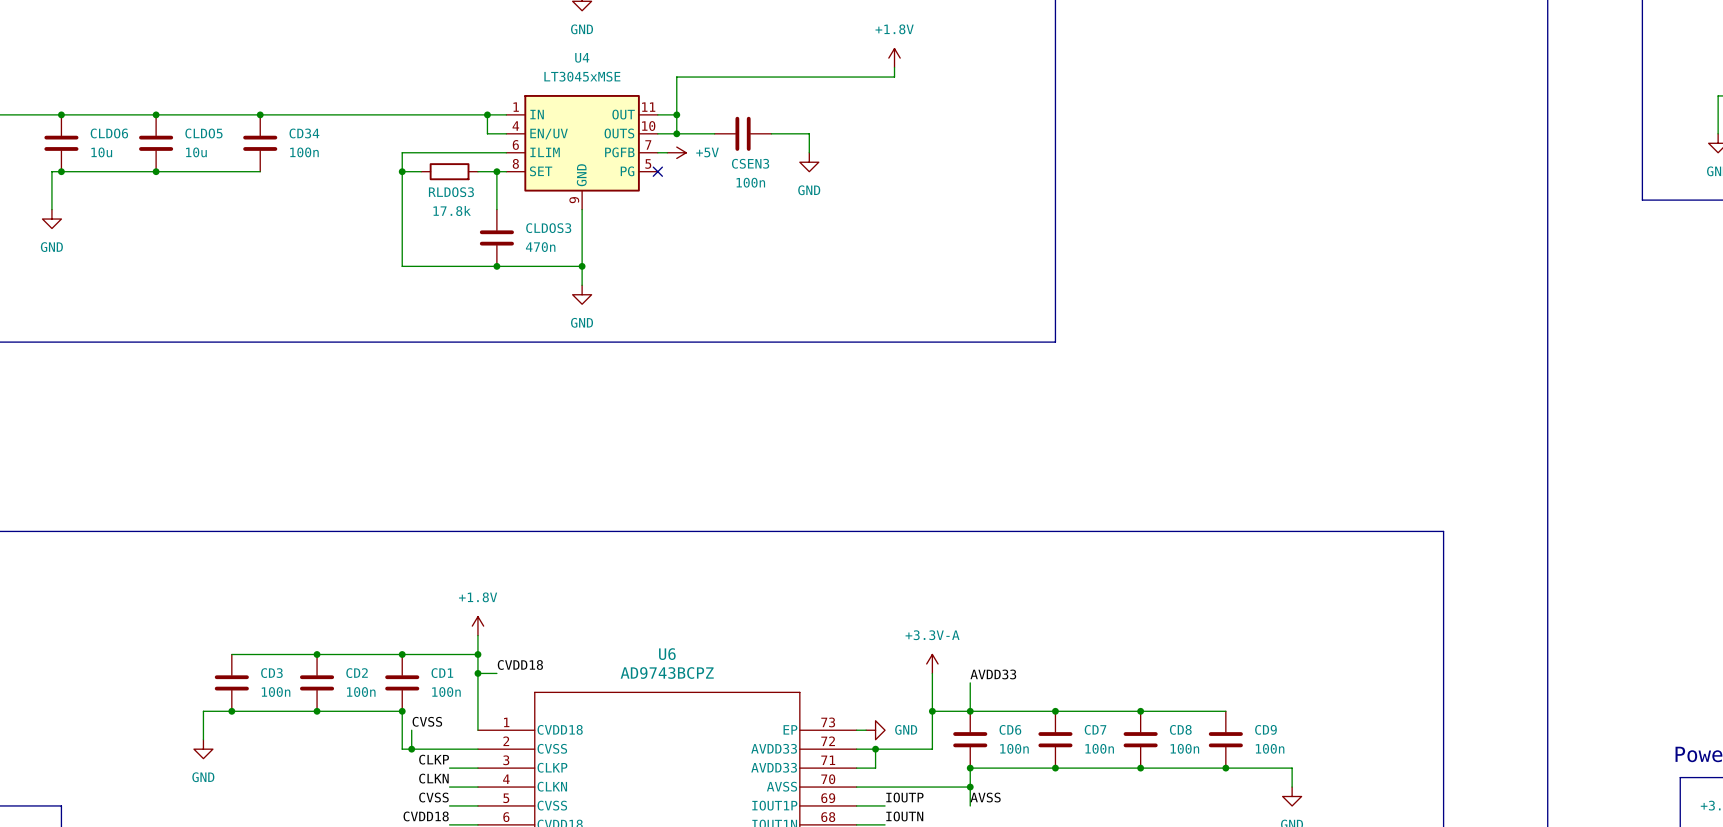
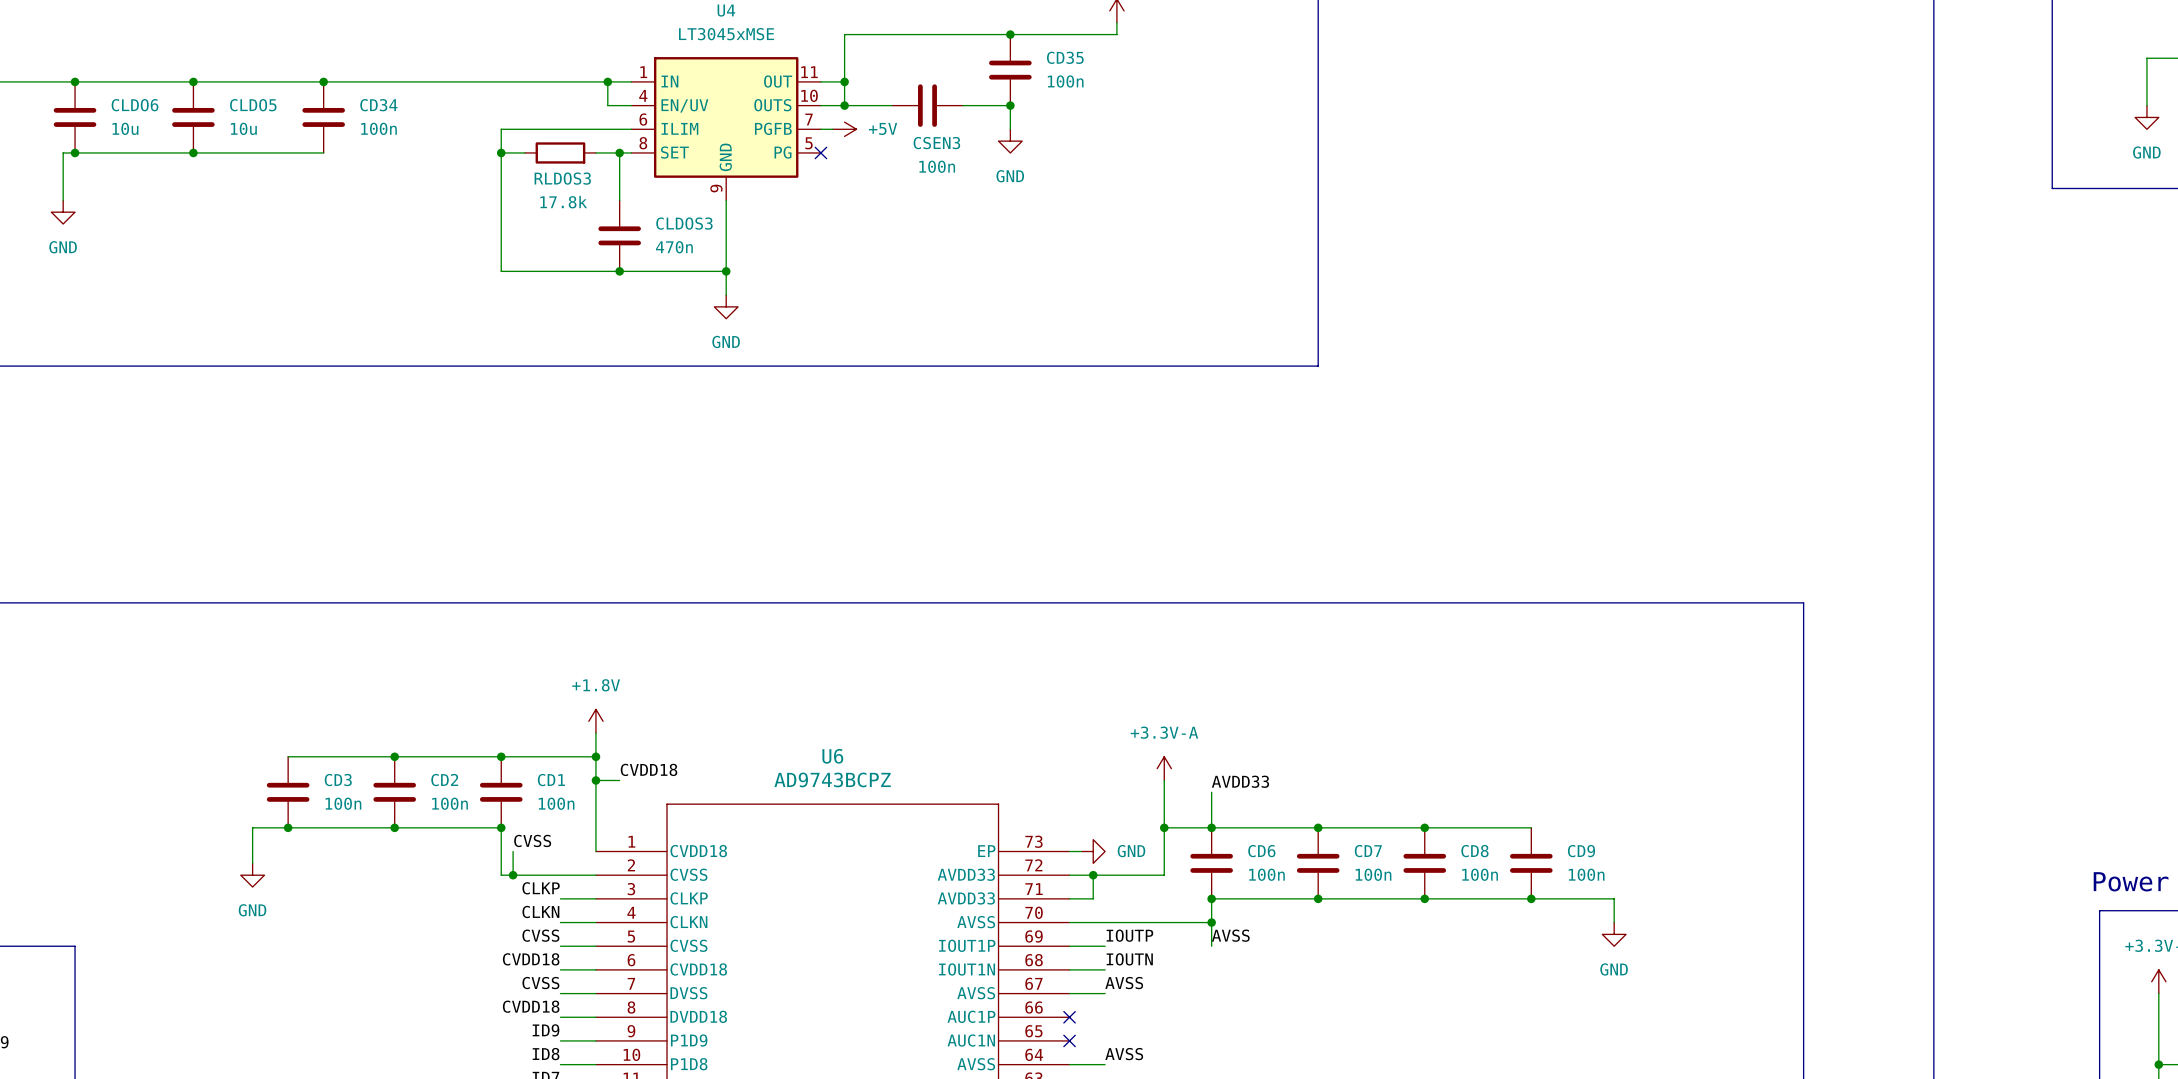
junction: none -> (1010, 34)
CD35: none -> 100n (1010, 70)
junction: none -> (1010, 105)

